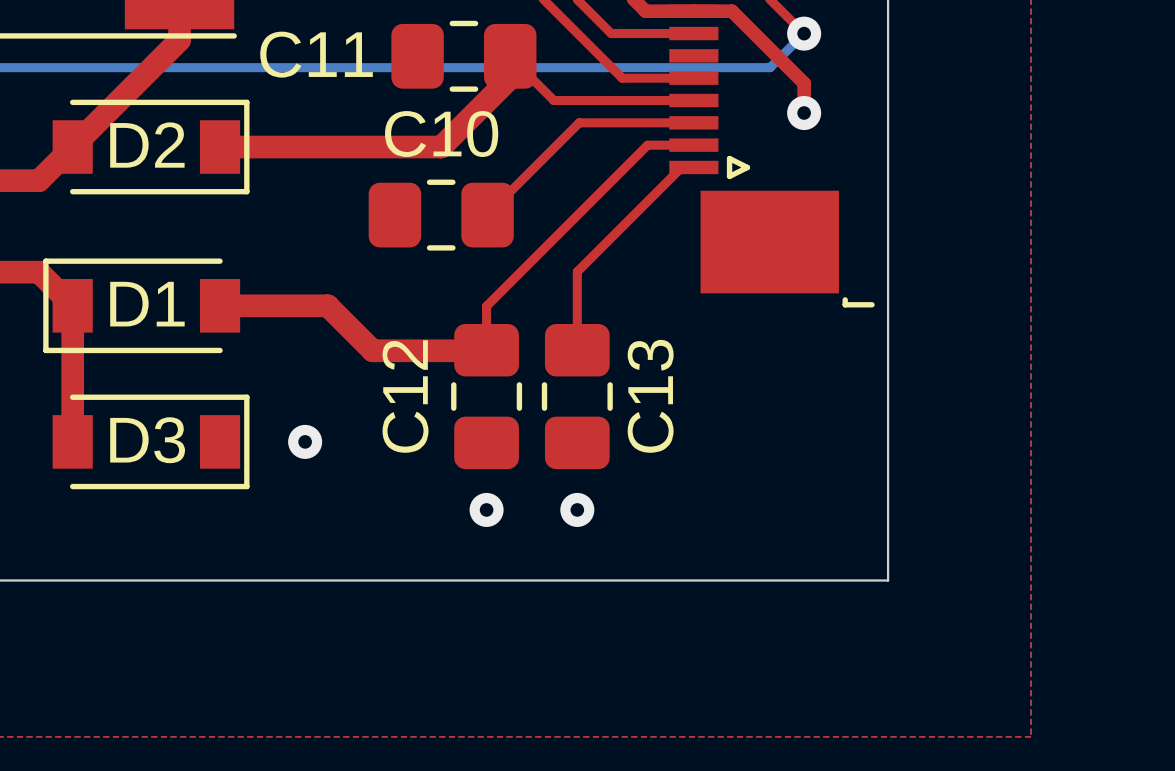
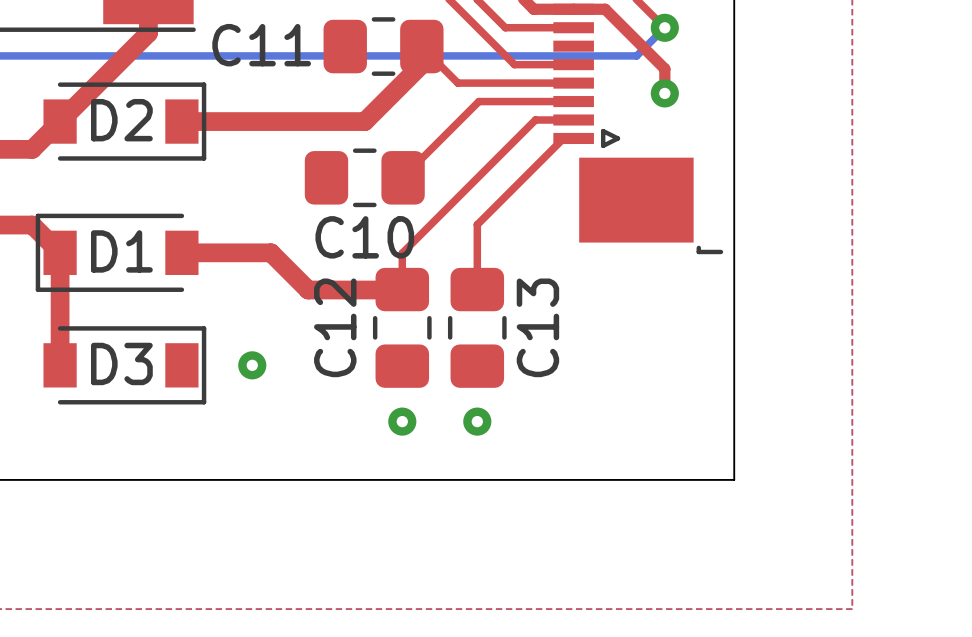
C10 name position: C10 (441, 134) -> C10 (364, 237)

